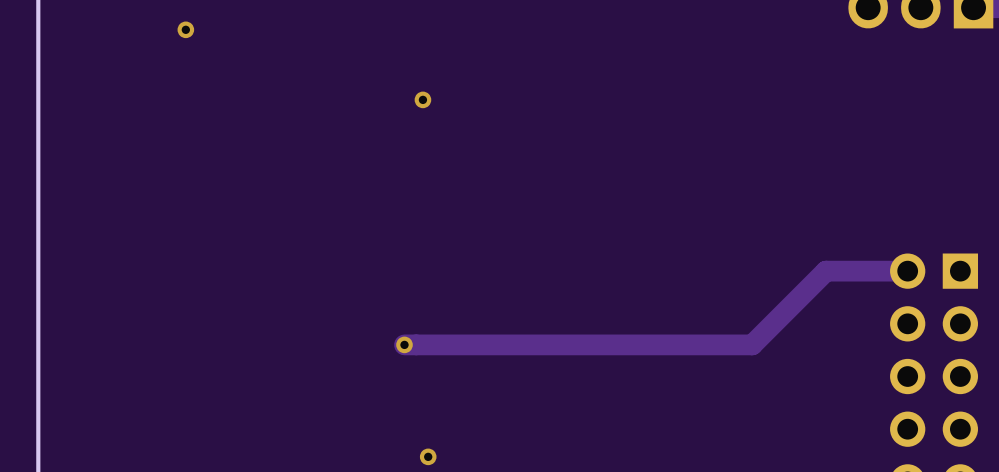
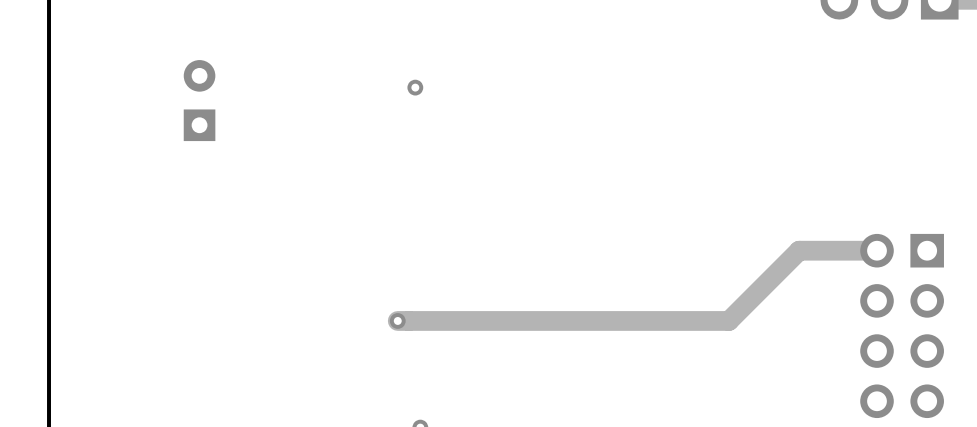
via: (185, 29) -> none
part: none -> (199, 100)

